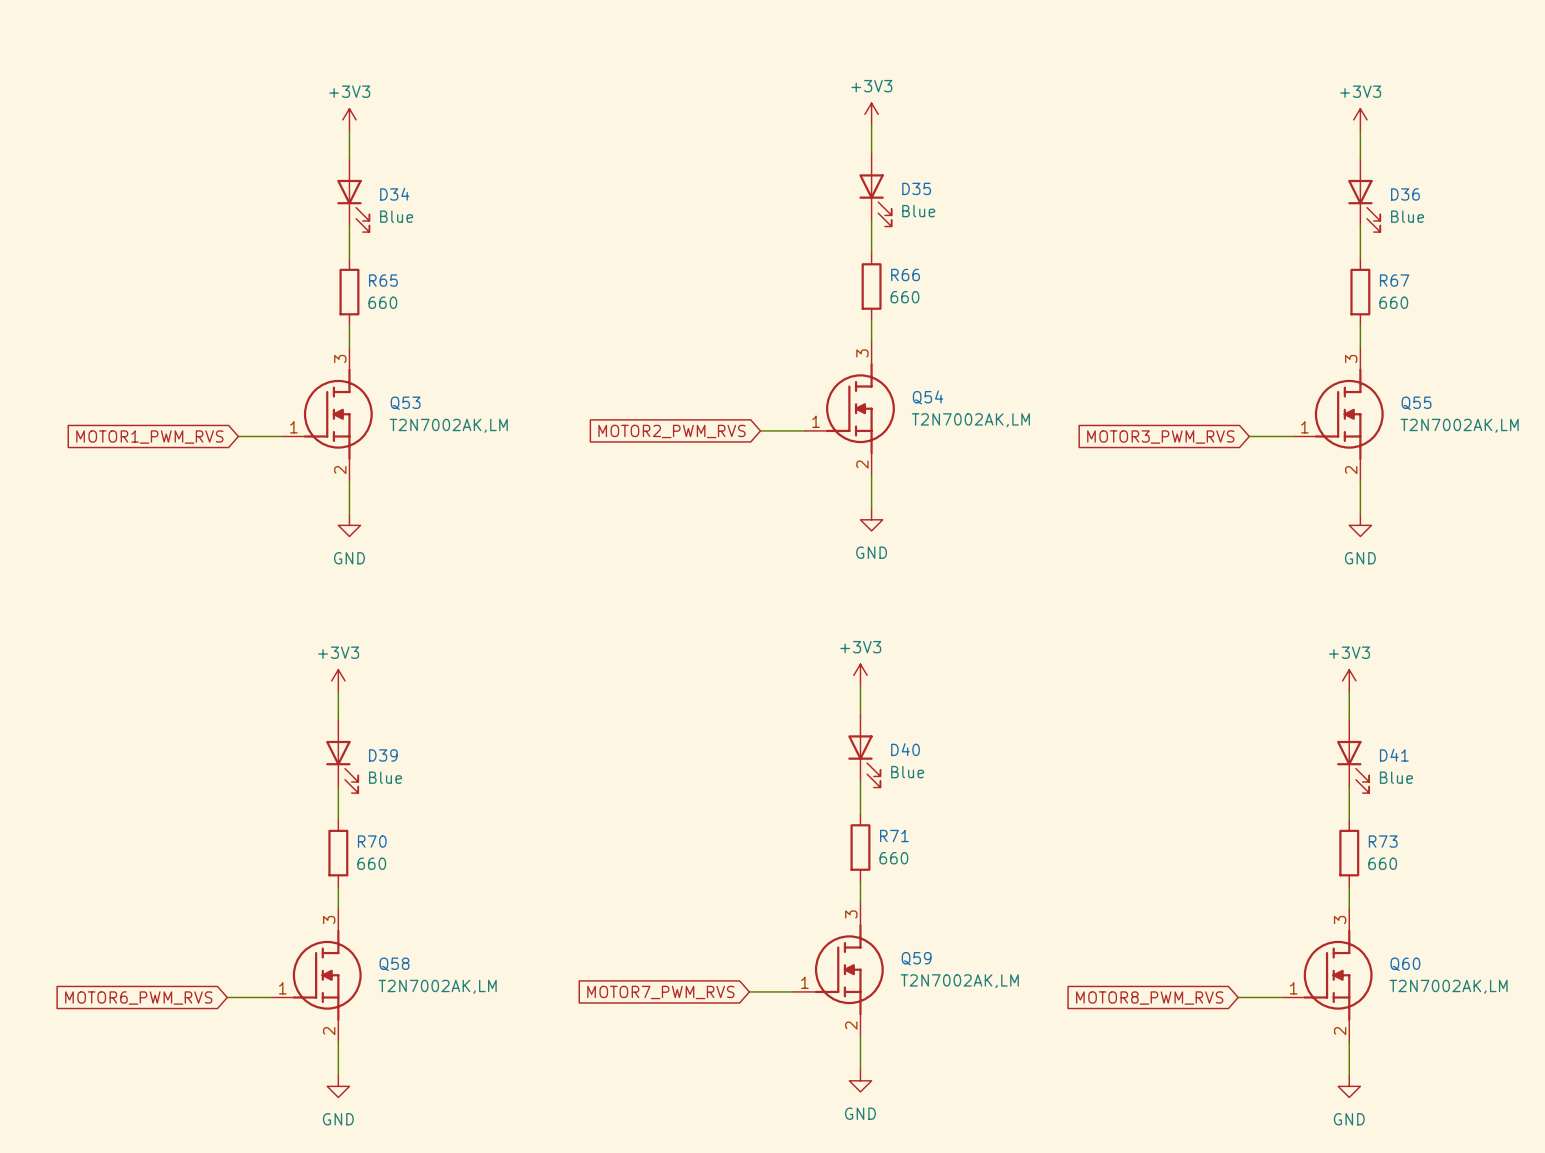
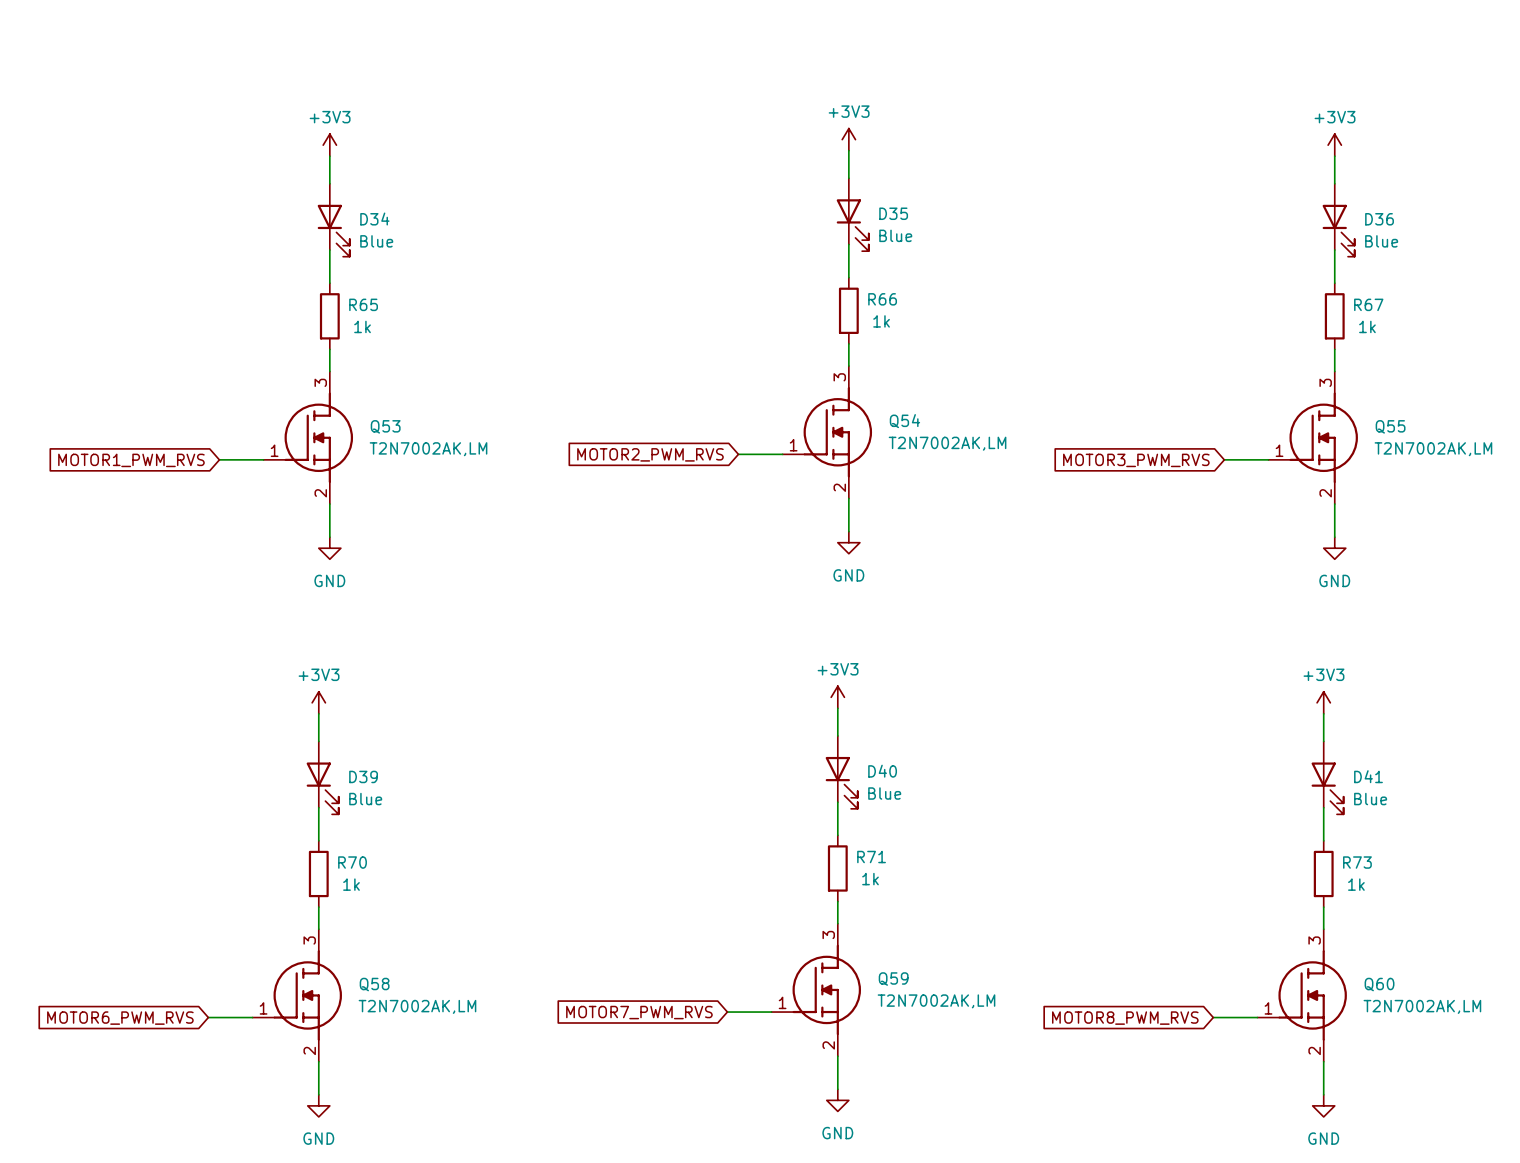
R66 value: 660 (904, 297) -> 1k (881, 321)
R65 value: 660 (382, 302) -> 1k (362, 326)
R67 value: 660 (1393, 302) -> 1k (1367, 326)
R71 value: 660 (893, 858) -> 1k (870, 879)
R70 value: 660 (371, 863) -> 1k (351, 884)
R73 value: 660 (1382, 863) -> 1k (1356, 884)

